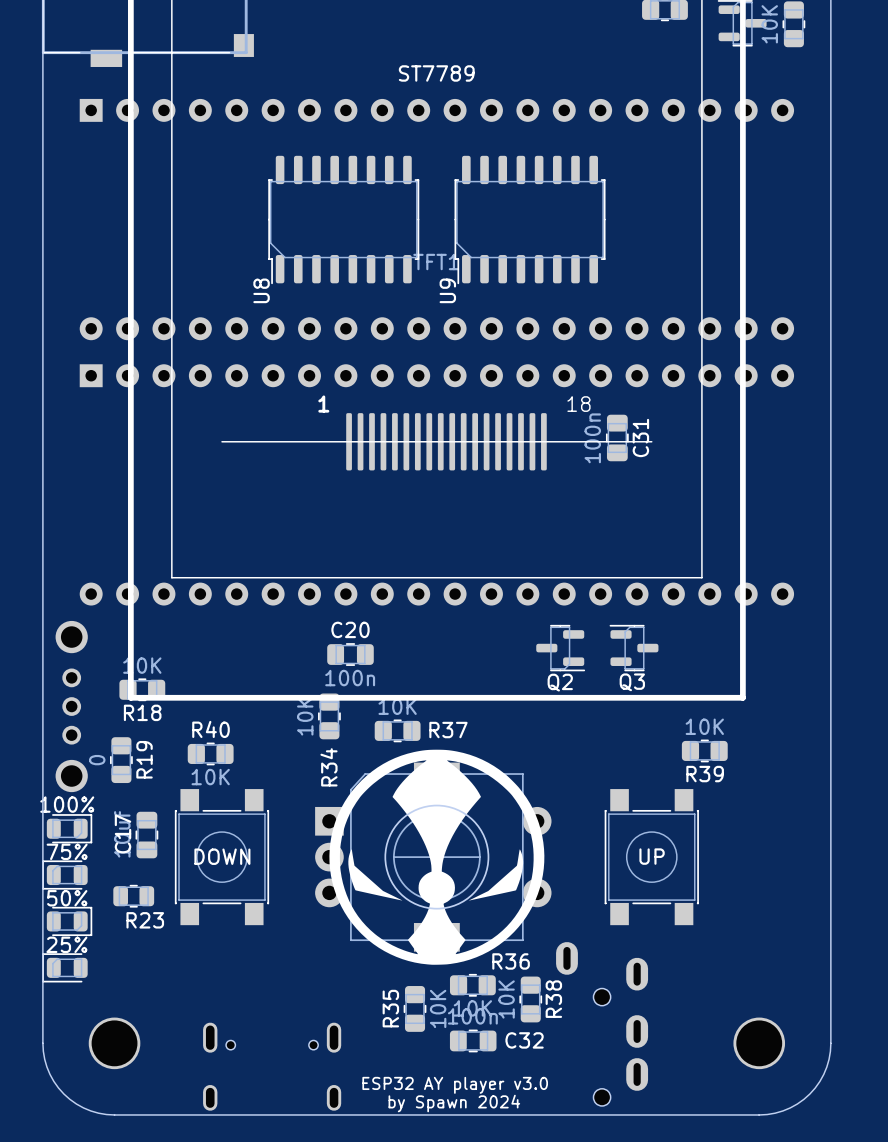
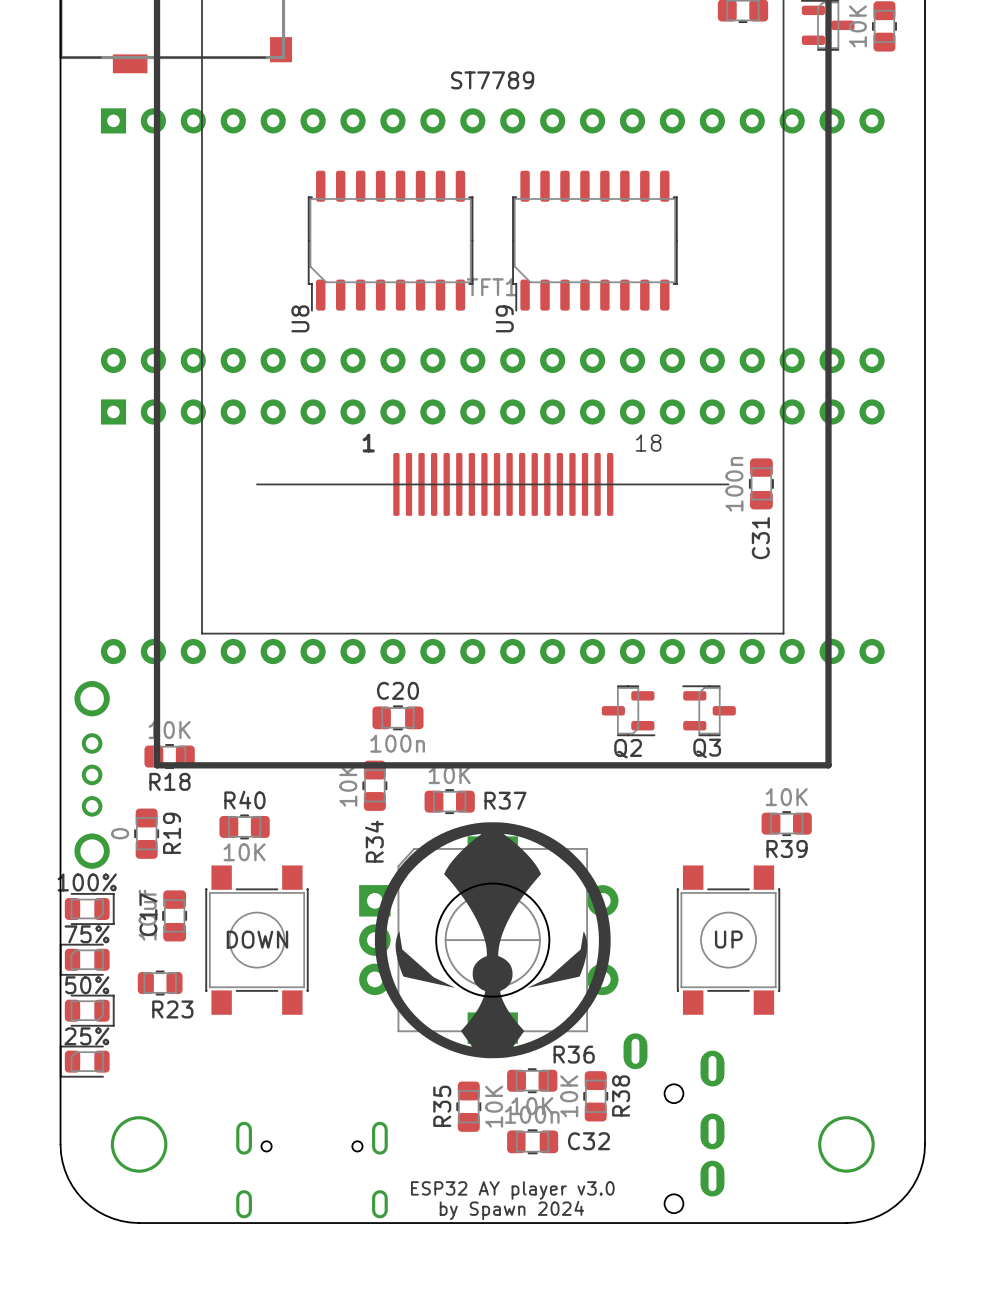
C31 position: (617, 437) -> (761, 483)
C31 name position: C31 (640, 437) -> C31 (760, 538)

